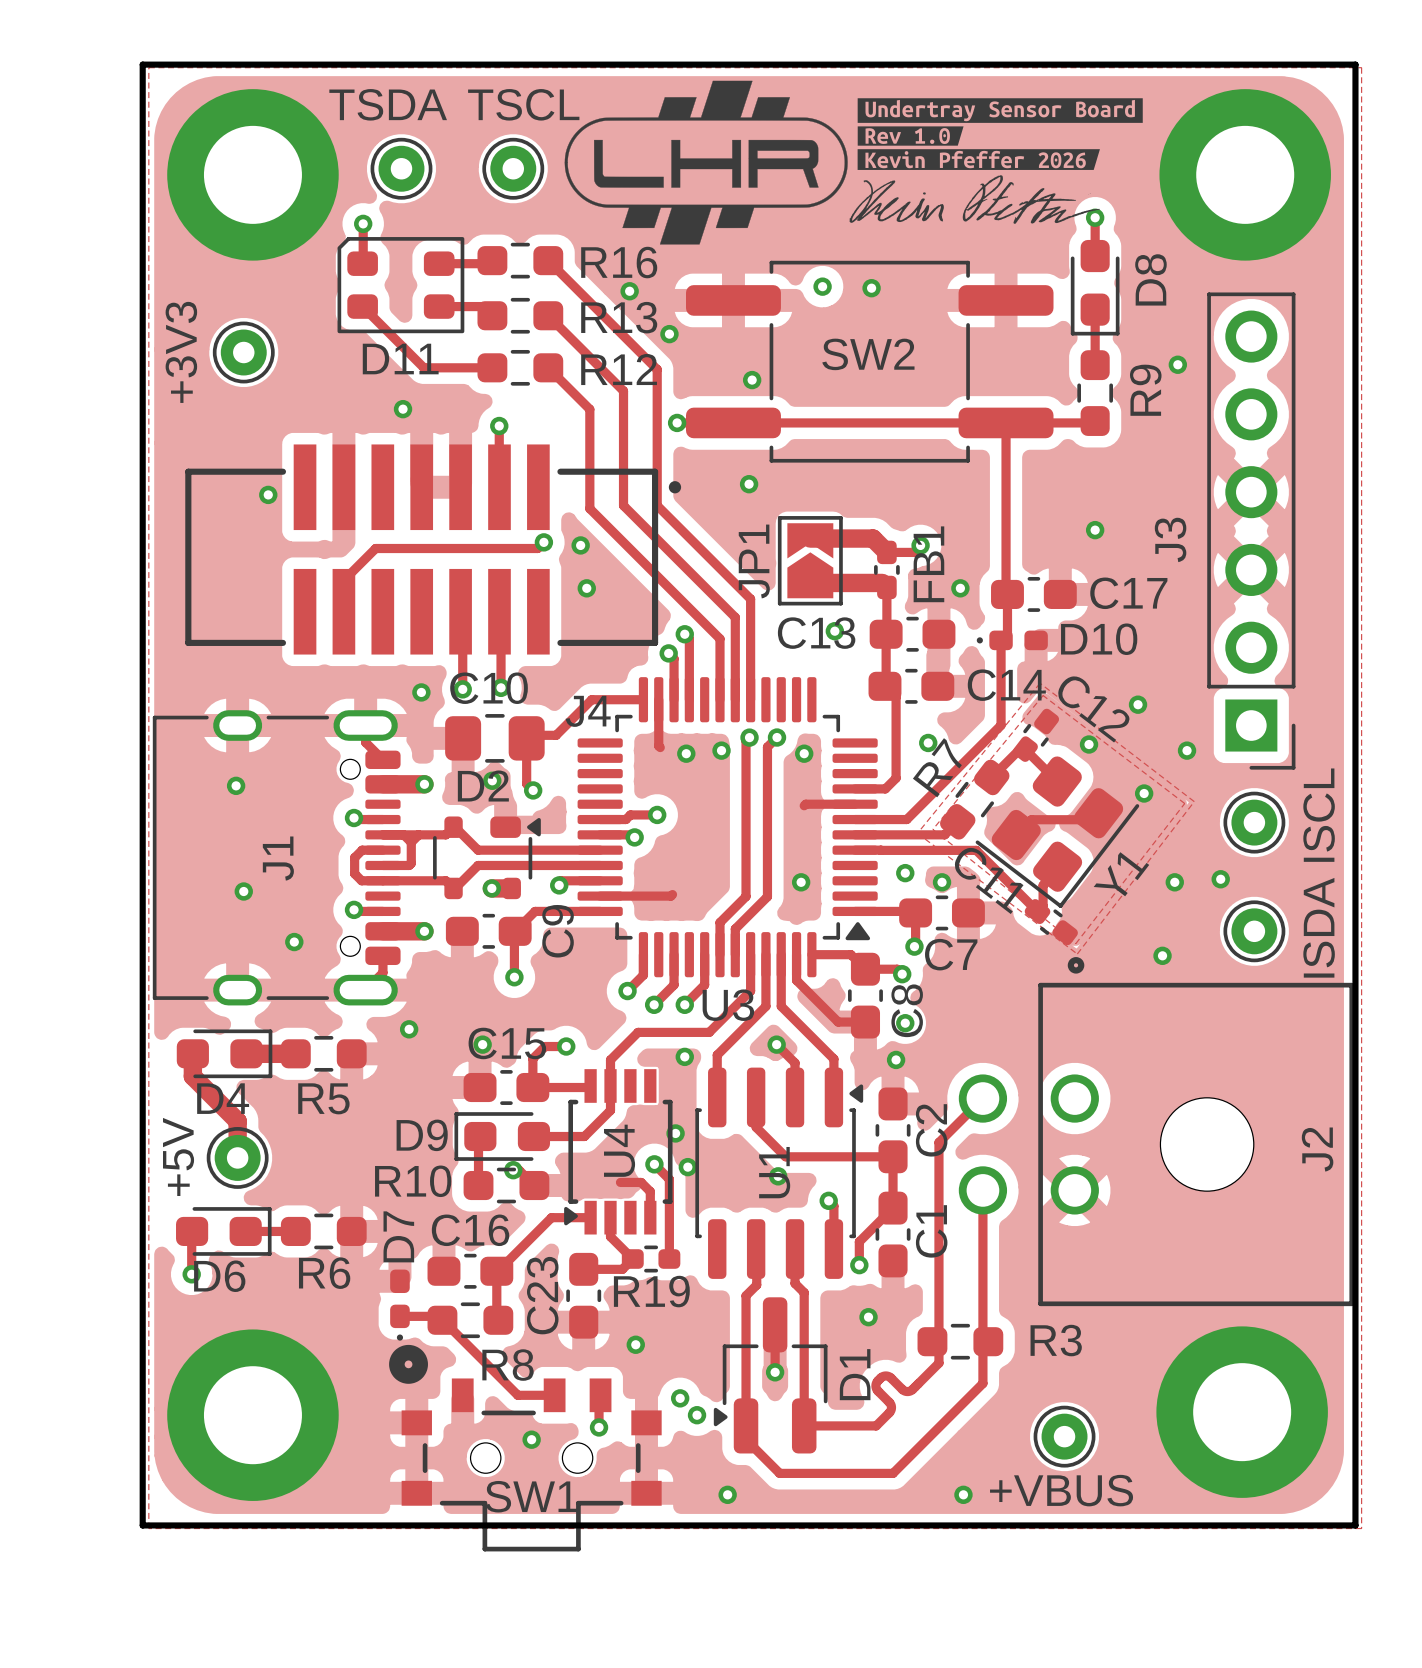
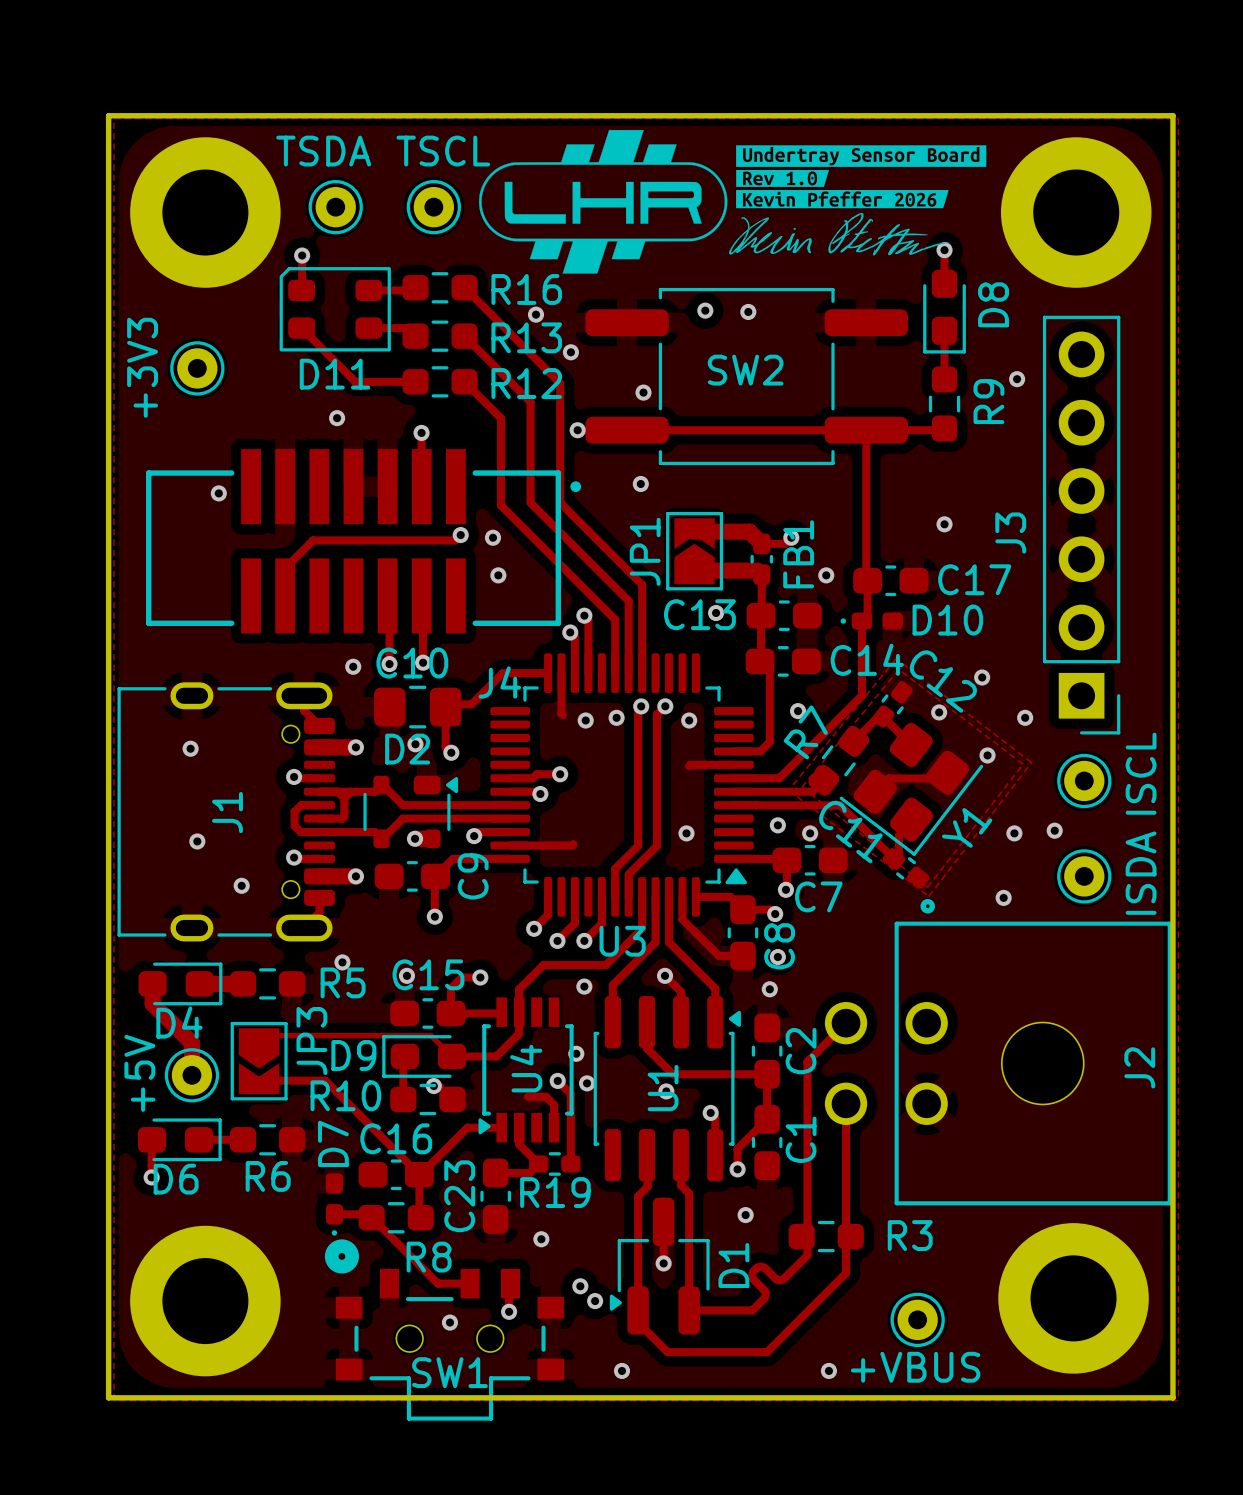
R5 name position: R5 (323, 1098) -> R5 (343, 982)
track: none -> (259, 1041) (265, 1035) (431, 1035) (451, 1056)
JP3: none -> (259, 1061)
track: none -> (259, 1080) (325, 1080) (419, 1174)

